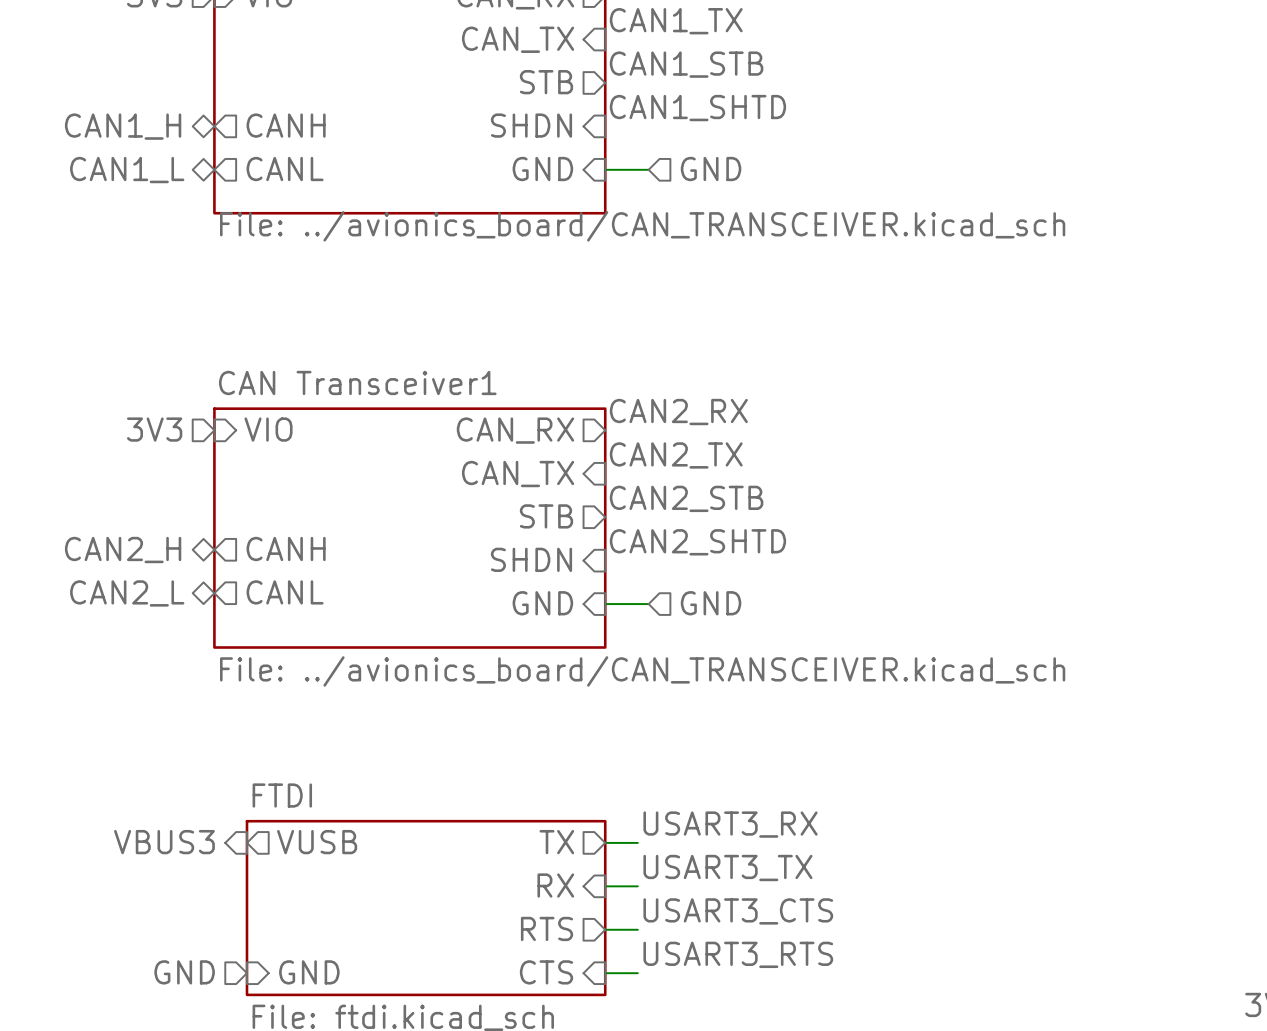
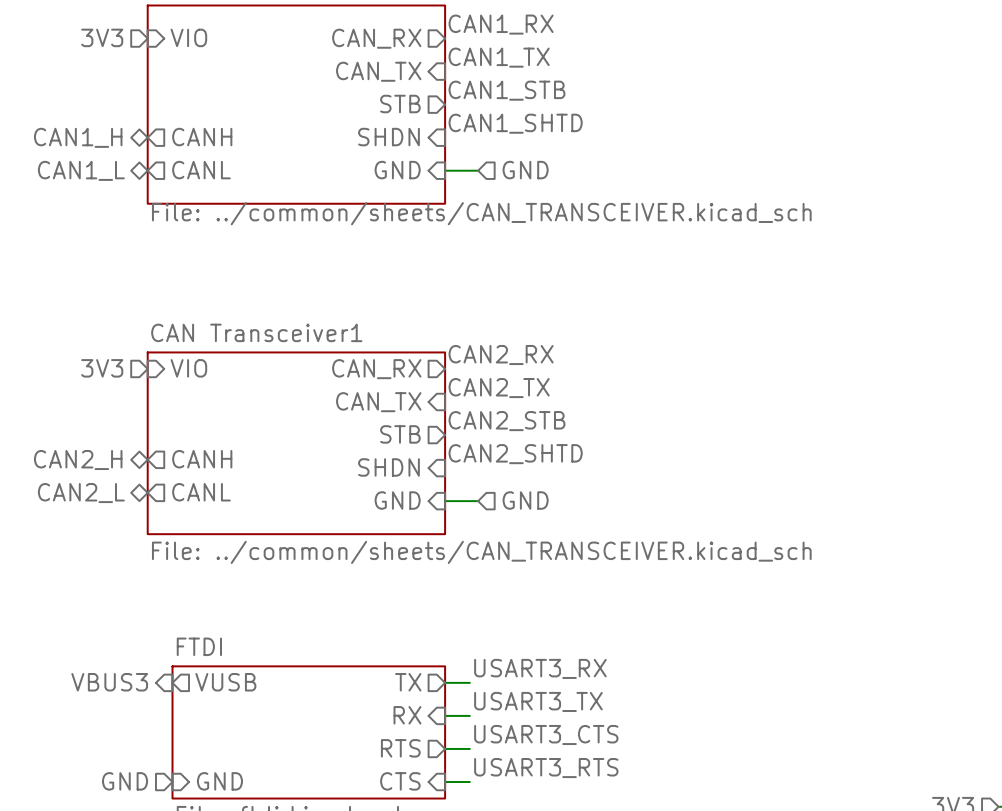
sheet value: File: ../avionics_board/CAN_TRANSCEIVER.kicad_sch (642, 226) -> File: ../common/sheets/CAN_TRANSCEIVER.kicad_sch (481, 213)
sheet CAN Transceiver1 value: File: ../avionics_board/CAN_TRANSCEIVER.kicad_sch (642, 671) -> File: ../common/sheets/CAN_TRANSCEIVER.kicad_sch (481, 552)

